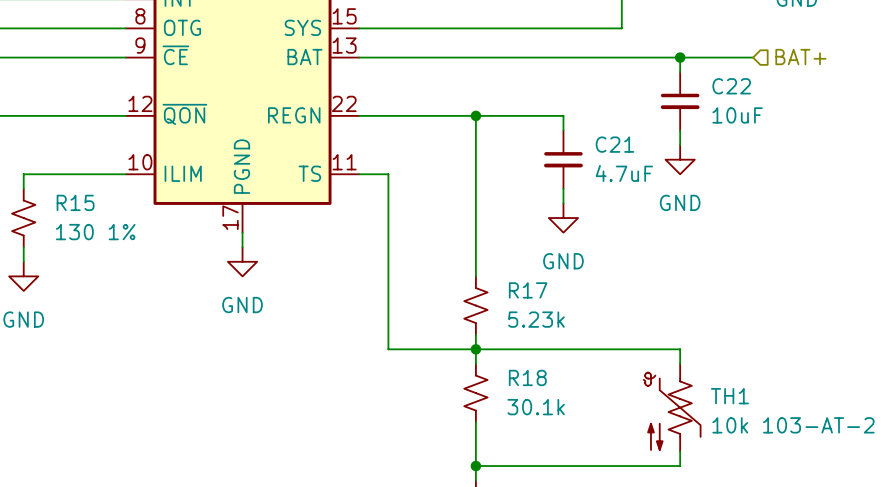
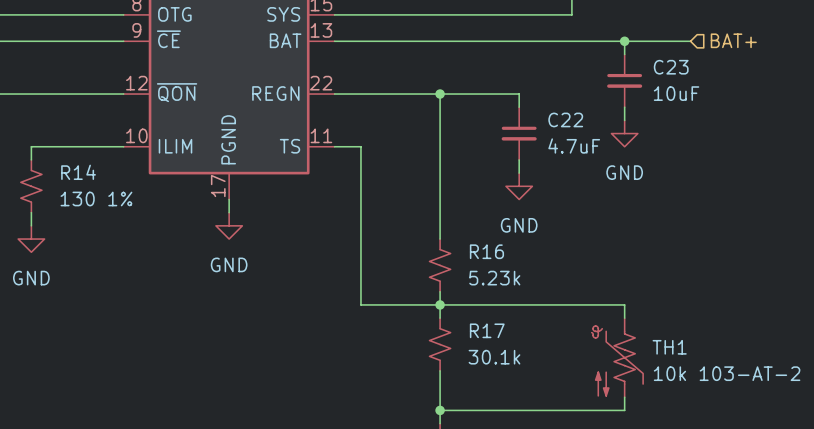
C22 name: C22 (731, 86) -> C23 (671, 67)
C21 name: C21 (614, 144) -> C22 (565, 119)
R15 name: R15 (75, 202) -> R14 (78, 172)
R17 name: R17 (528, 290) -> R16 (486, 251)
R18 name: R18 (527, 377) -> R17 (487, 330)

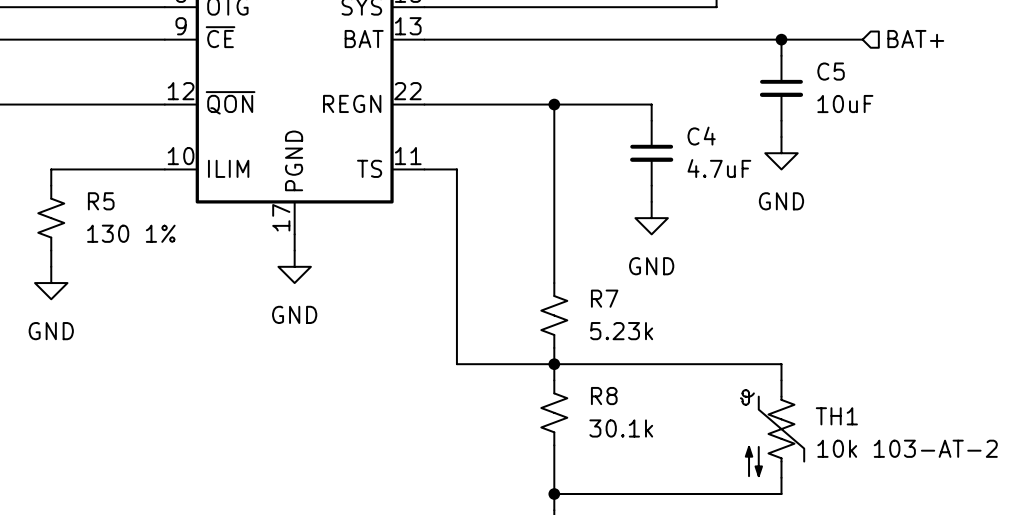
C23 name: C23 (671, 67) -> C5 (831, 71)
C22 name: C22 (565, 119) -> C4 (701, 136)
R14 name: R14 (78, 172) -> R5 (101, 201)
R16 name: R16 (486, 251) -> R7 (604, 298)
R17 name: R17 (487, 330) -> R8 (604, 396)

